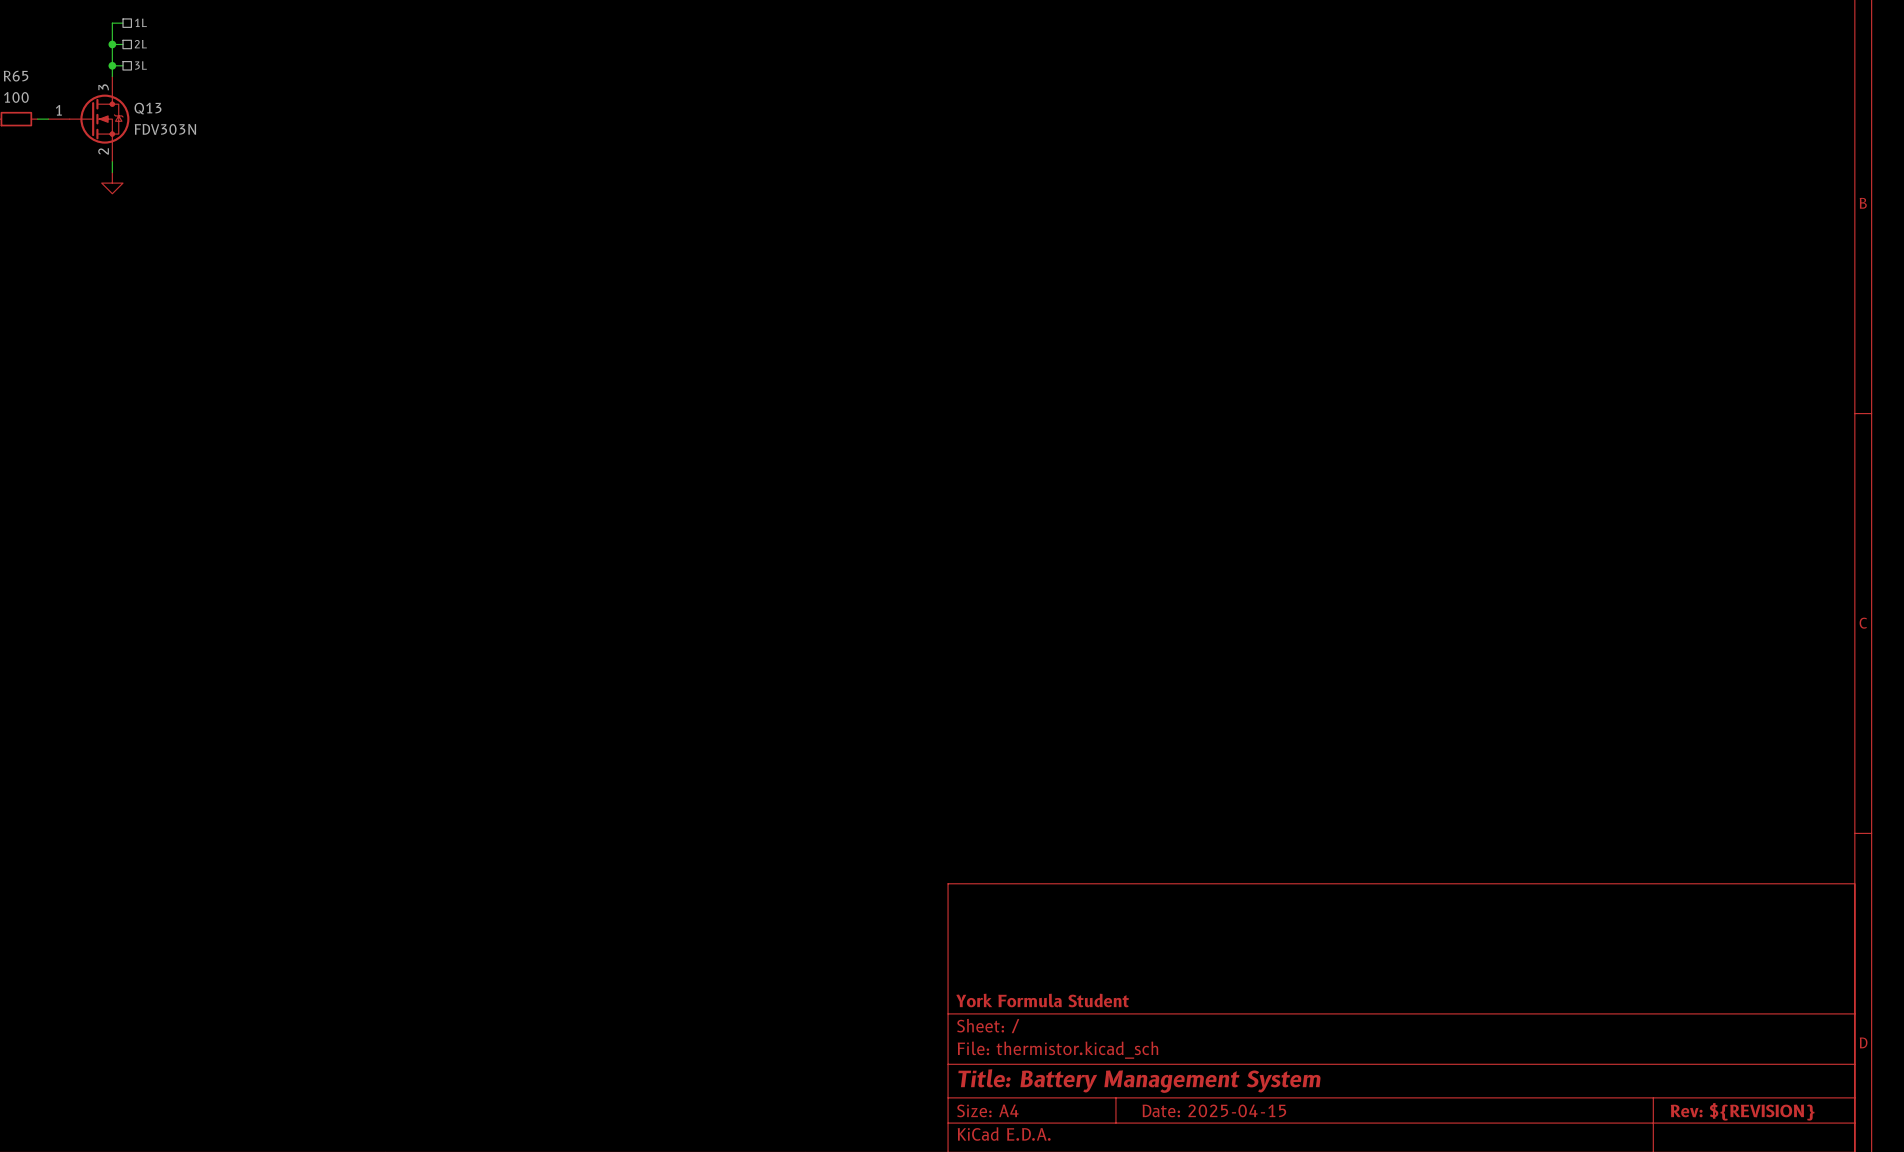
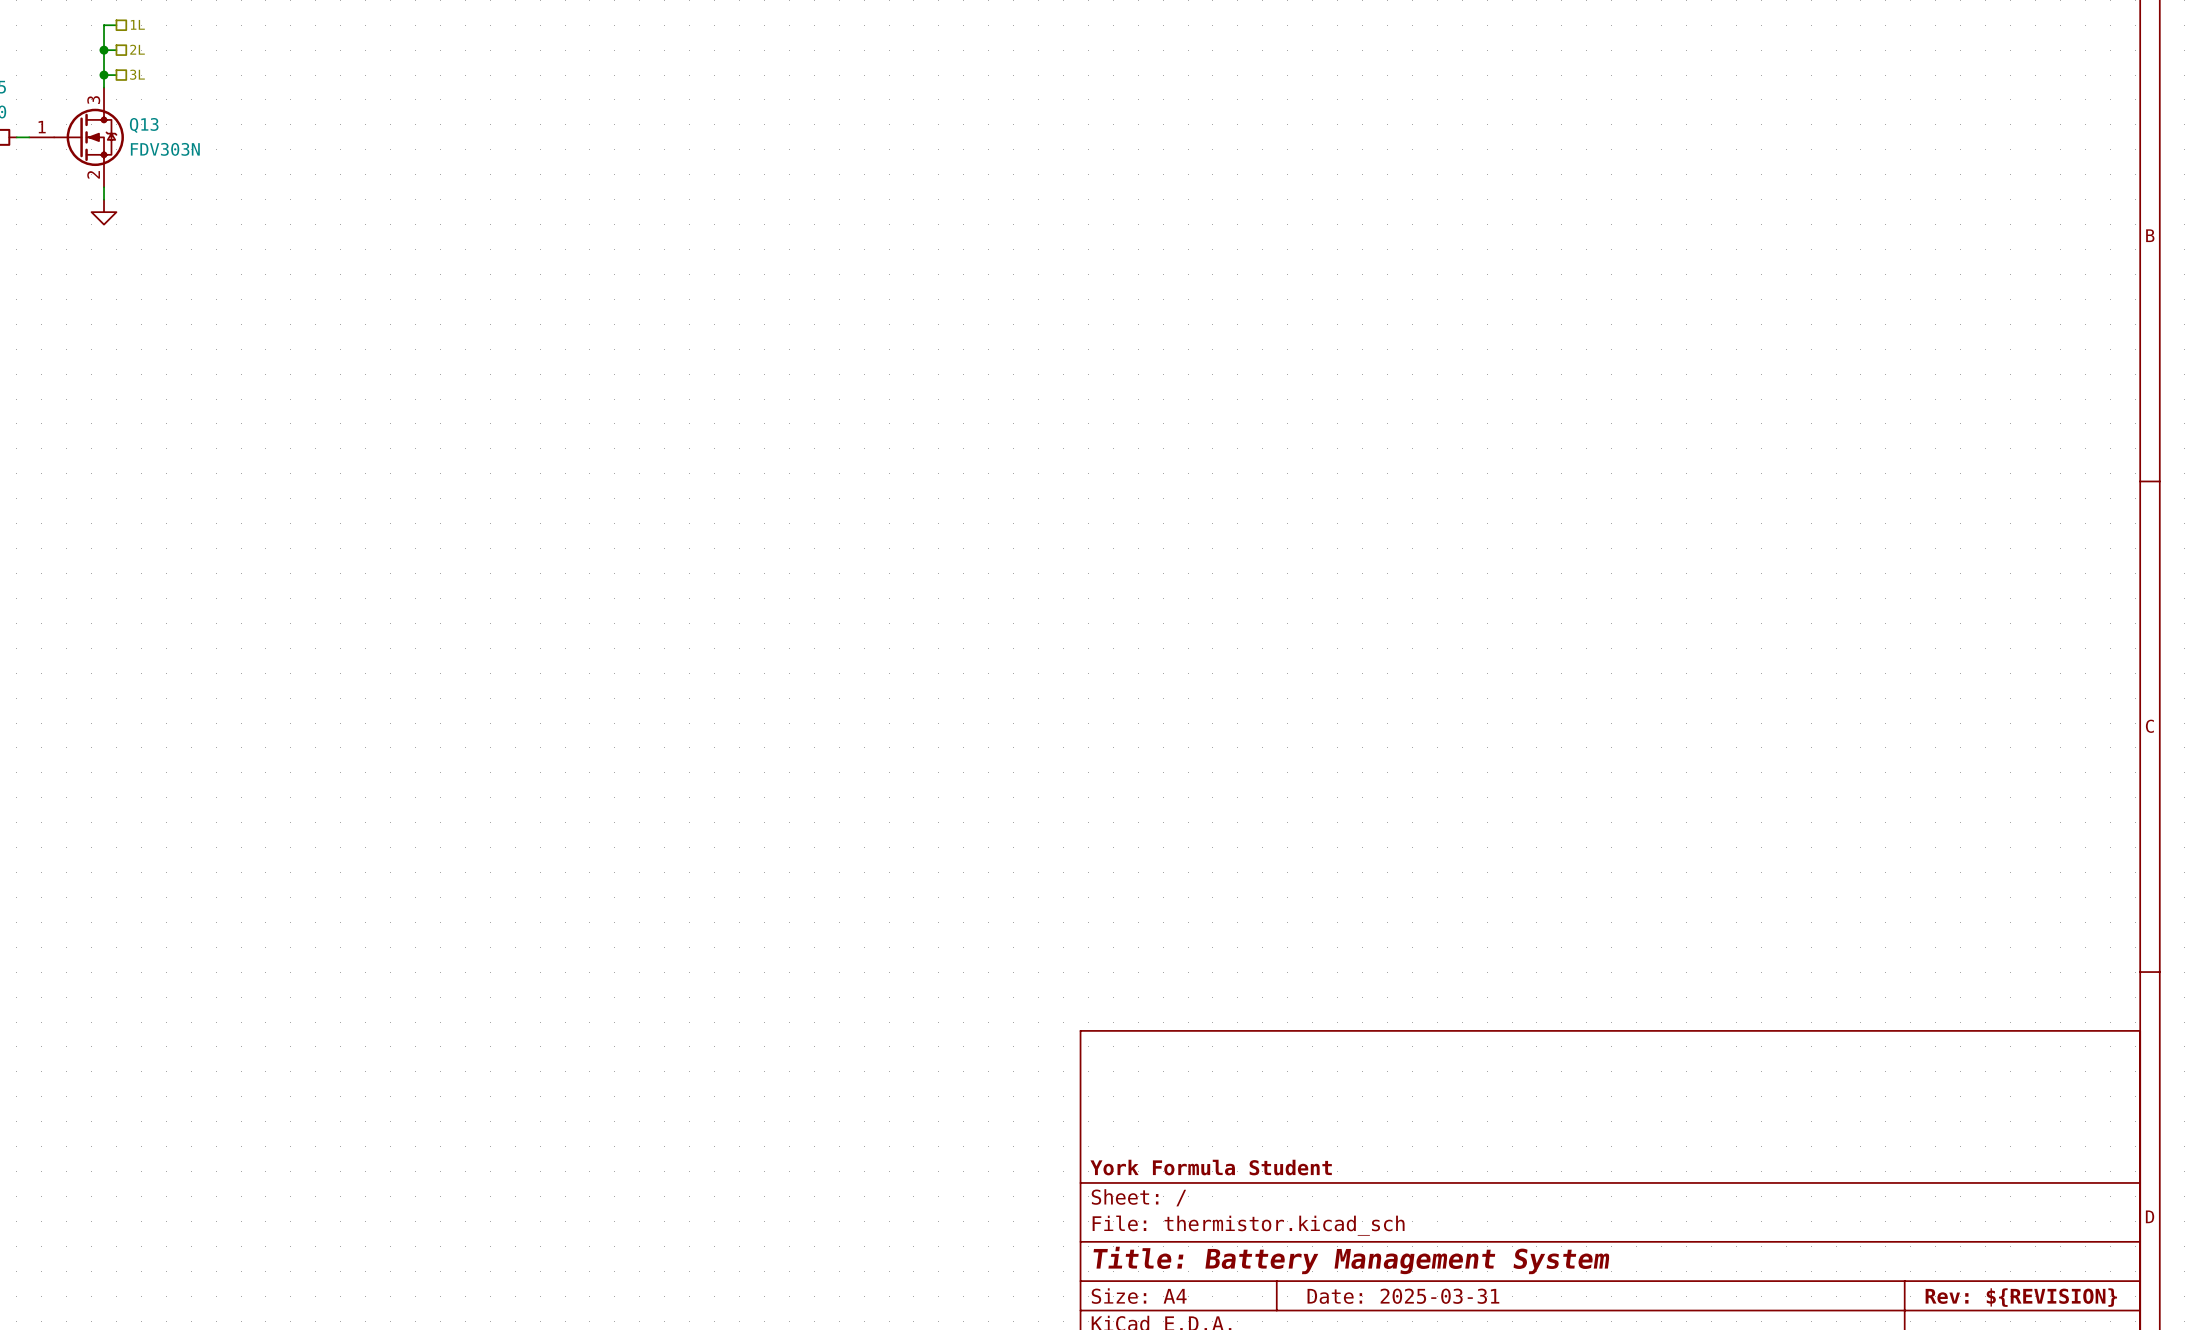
title block: Date: 2025-04-15 (1214, 1110) -> Date: 2025-03-31 (1403, 1296)

